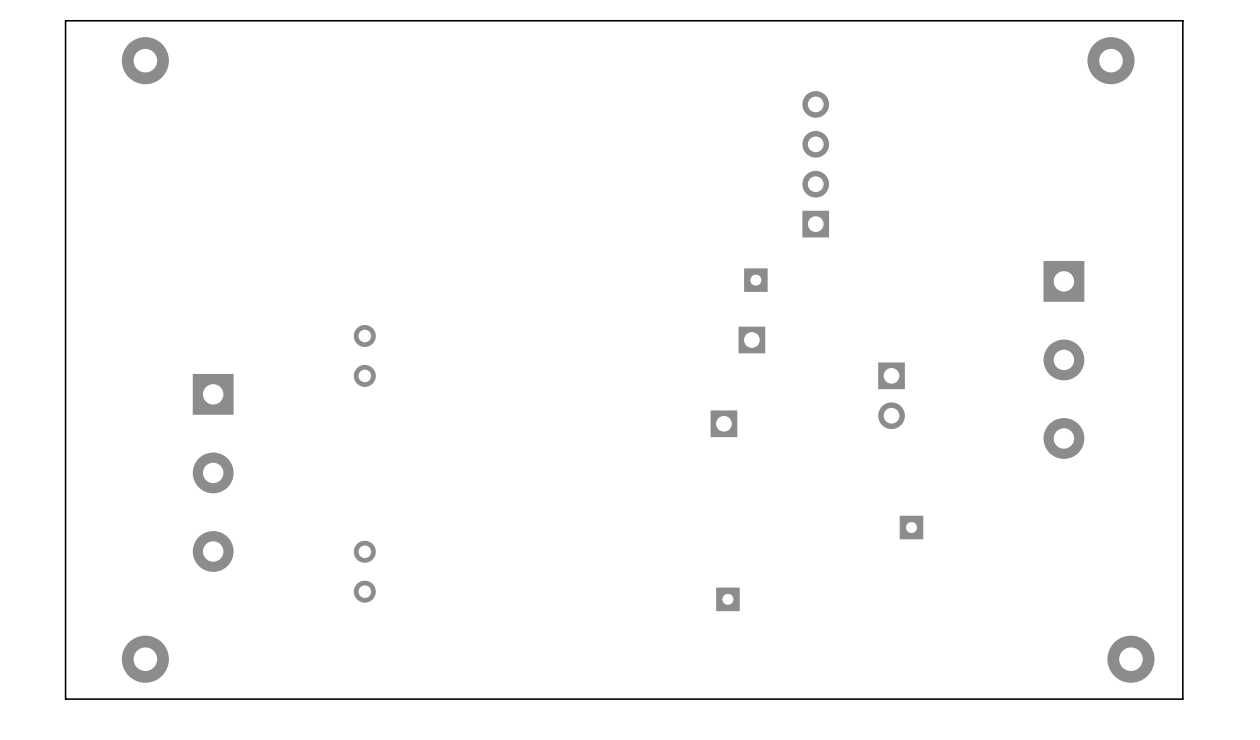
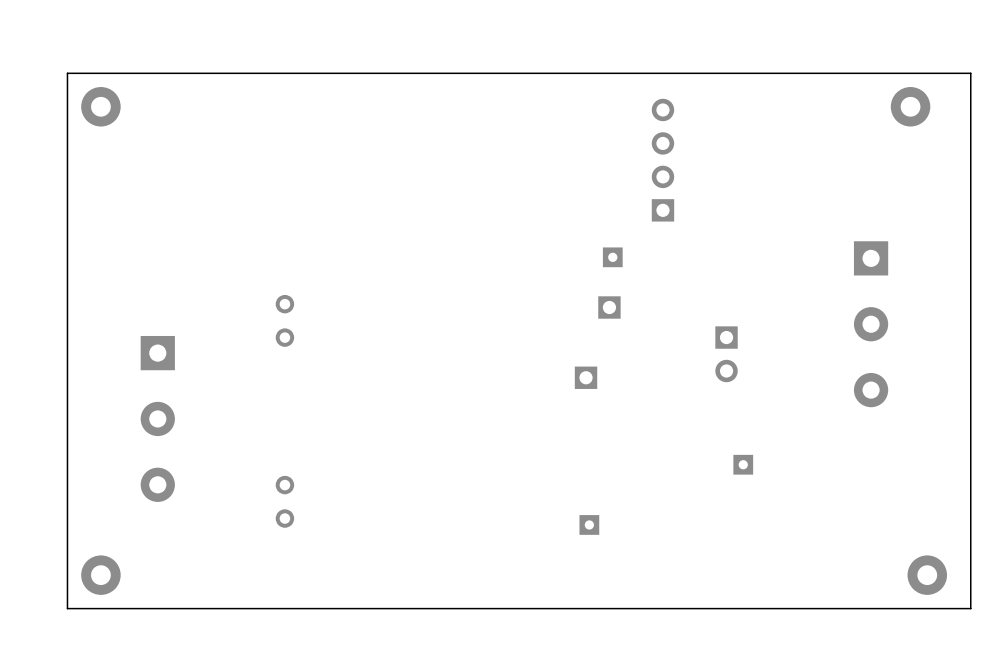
part position: (145, 60) -> (100, 106)
part position: (1111, 60) -> (910, 106)
board edge: (1182, 60) (1182, 20) (65, 20) (65, 699) (105, 699) -> (970, 73) (67, 73) (67, 608)

